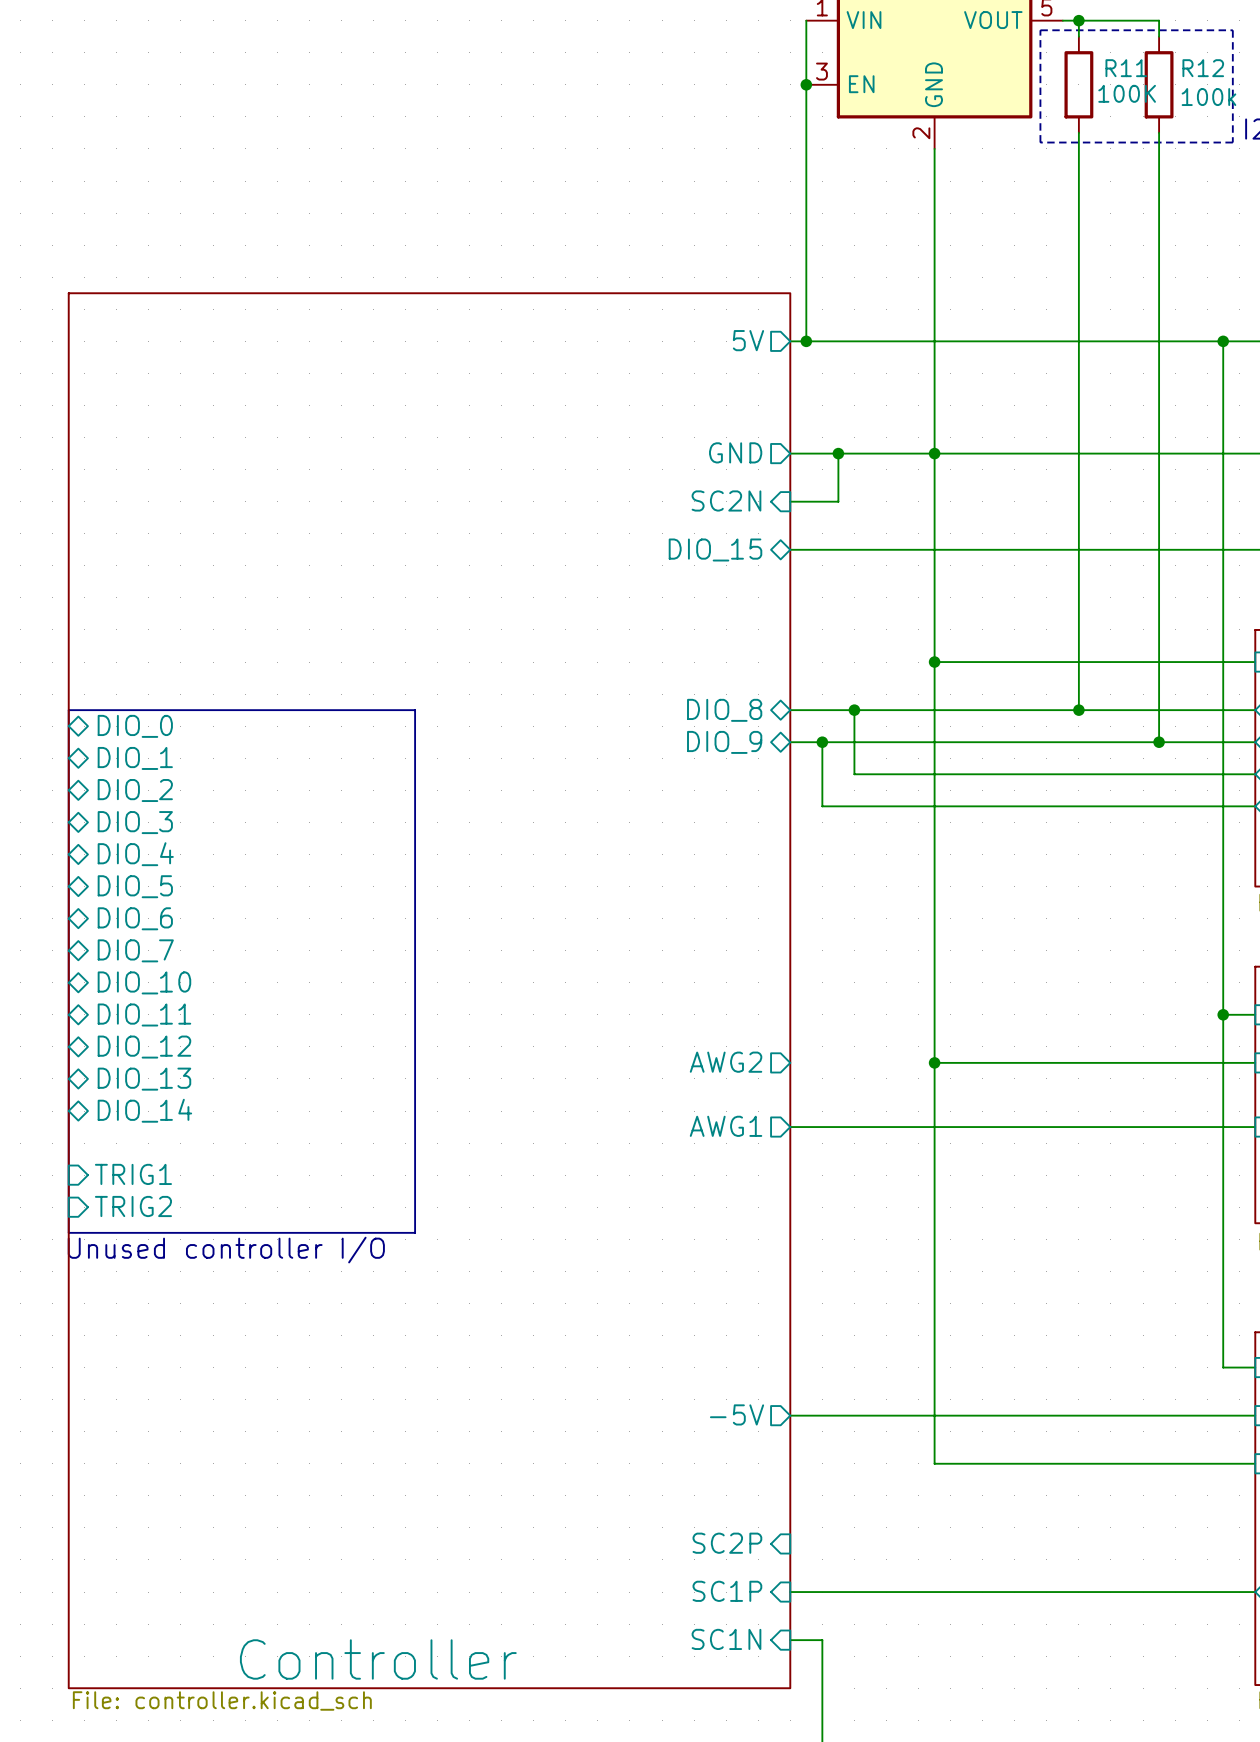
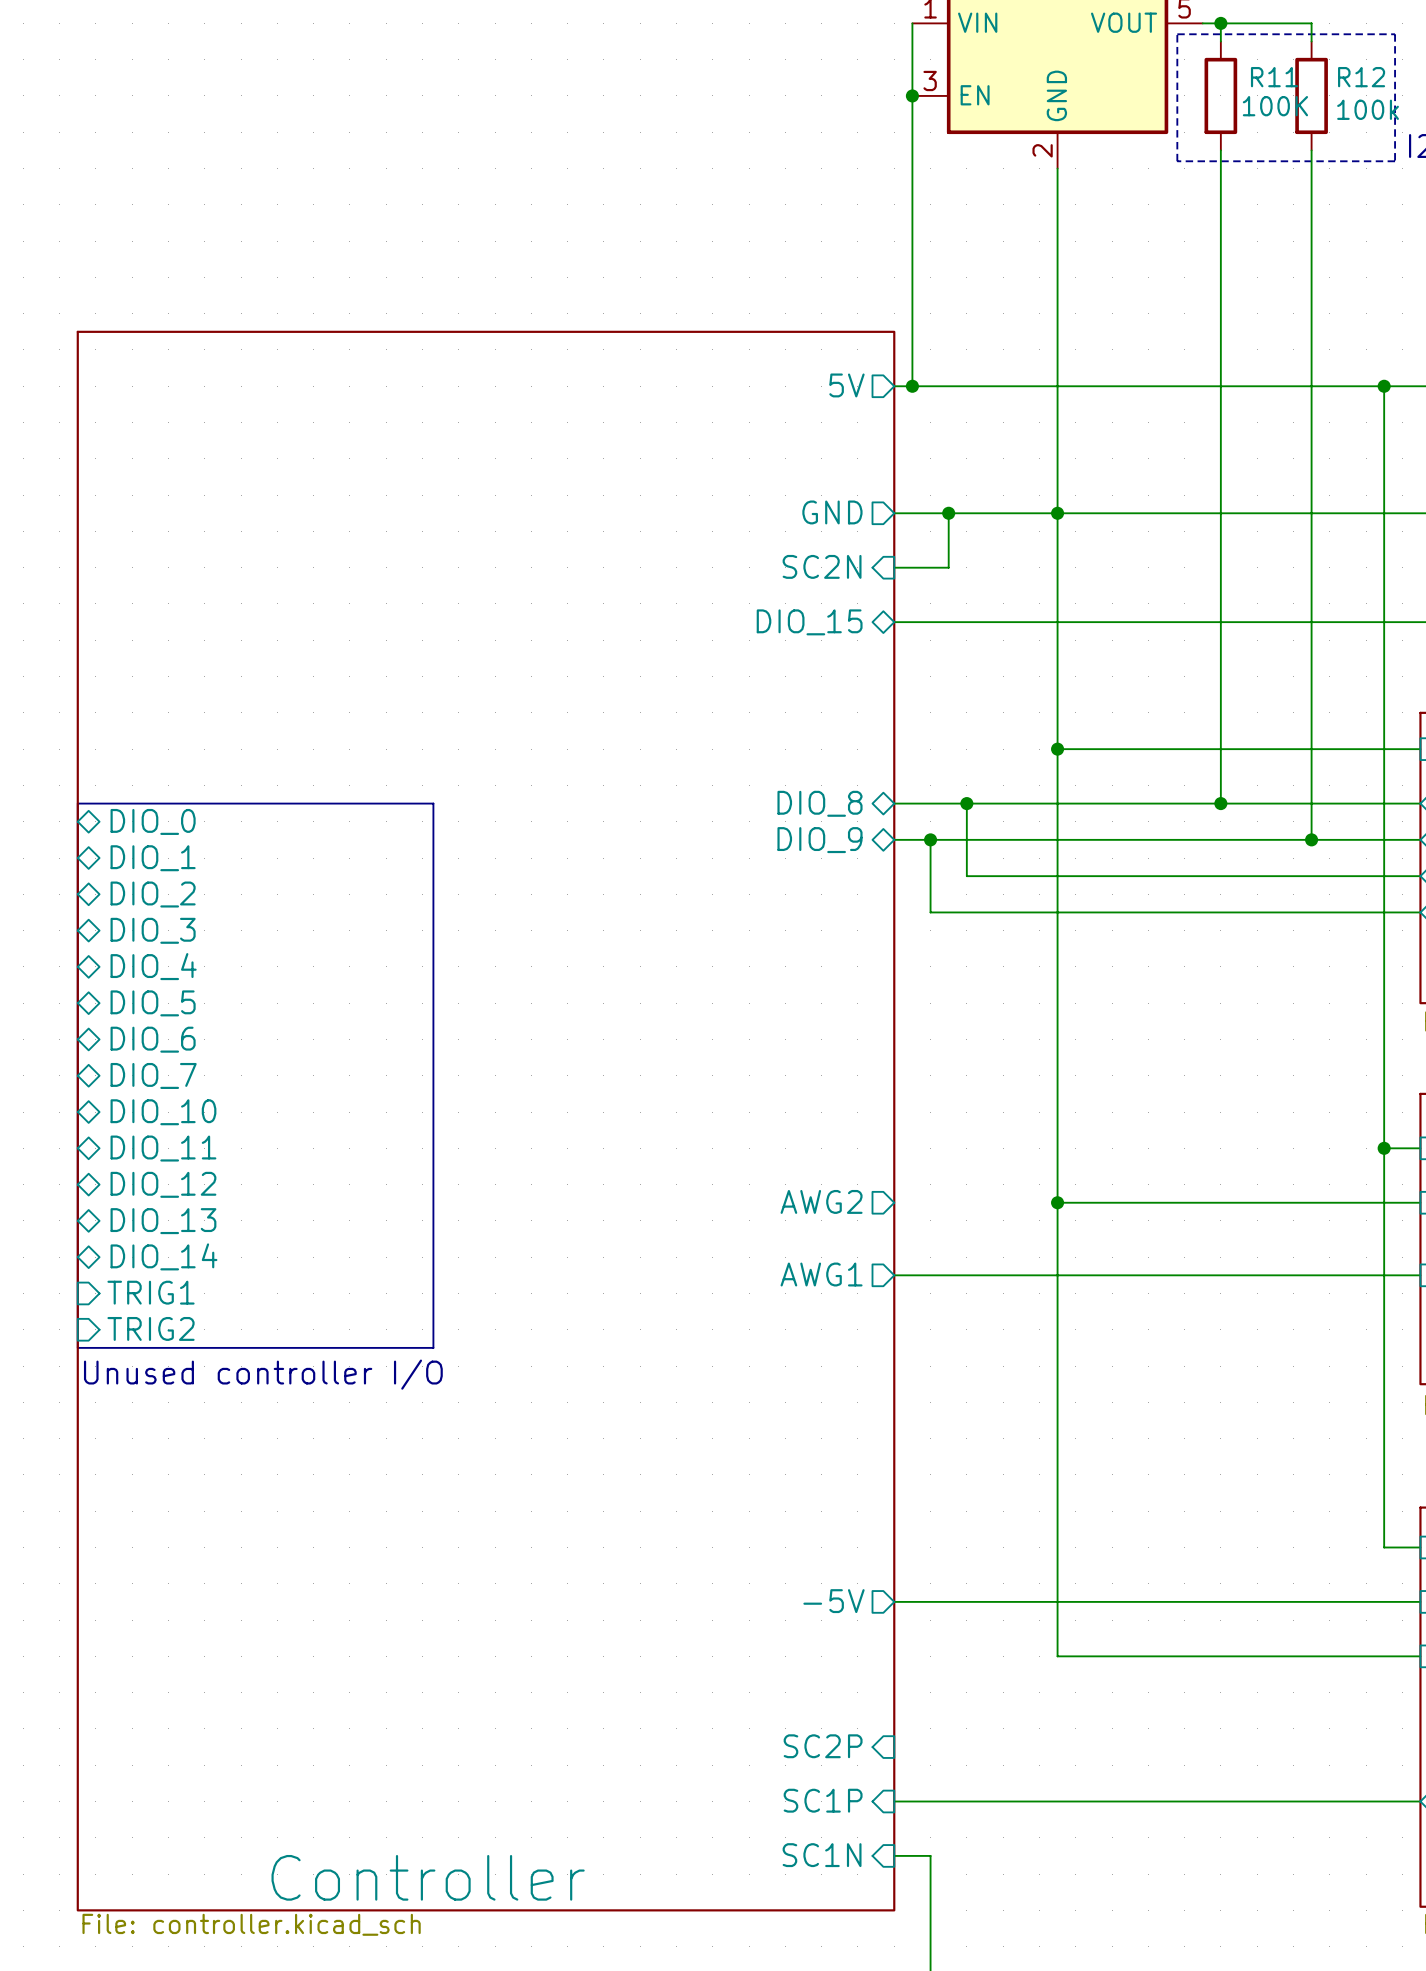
line: (383, 710) (415, 710) (415, 1232) (68, 1232) (68, 1191) -> (433, 803) (433, 1347) (77, 1347)
sheet pin: none -> TRIG1 (151, 1292)
sheet pin: TRIG1 (133, 1174) -> TRIG2 (151, 1328)
sheet pin: TRIG2 (133, 1206) -> none
text position: Unused controller I/O (226, 1250) -> Unused controller I/O (263, 1374)

